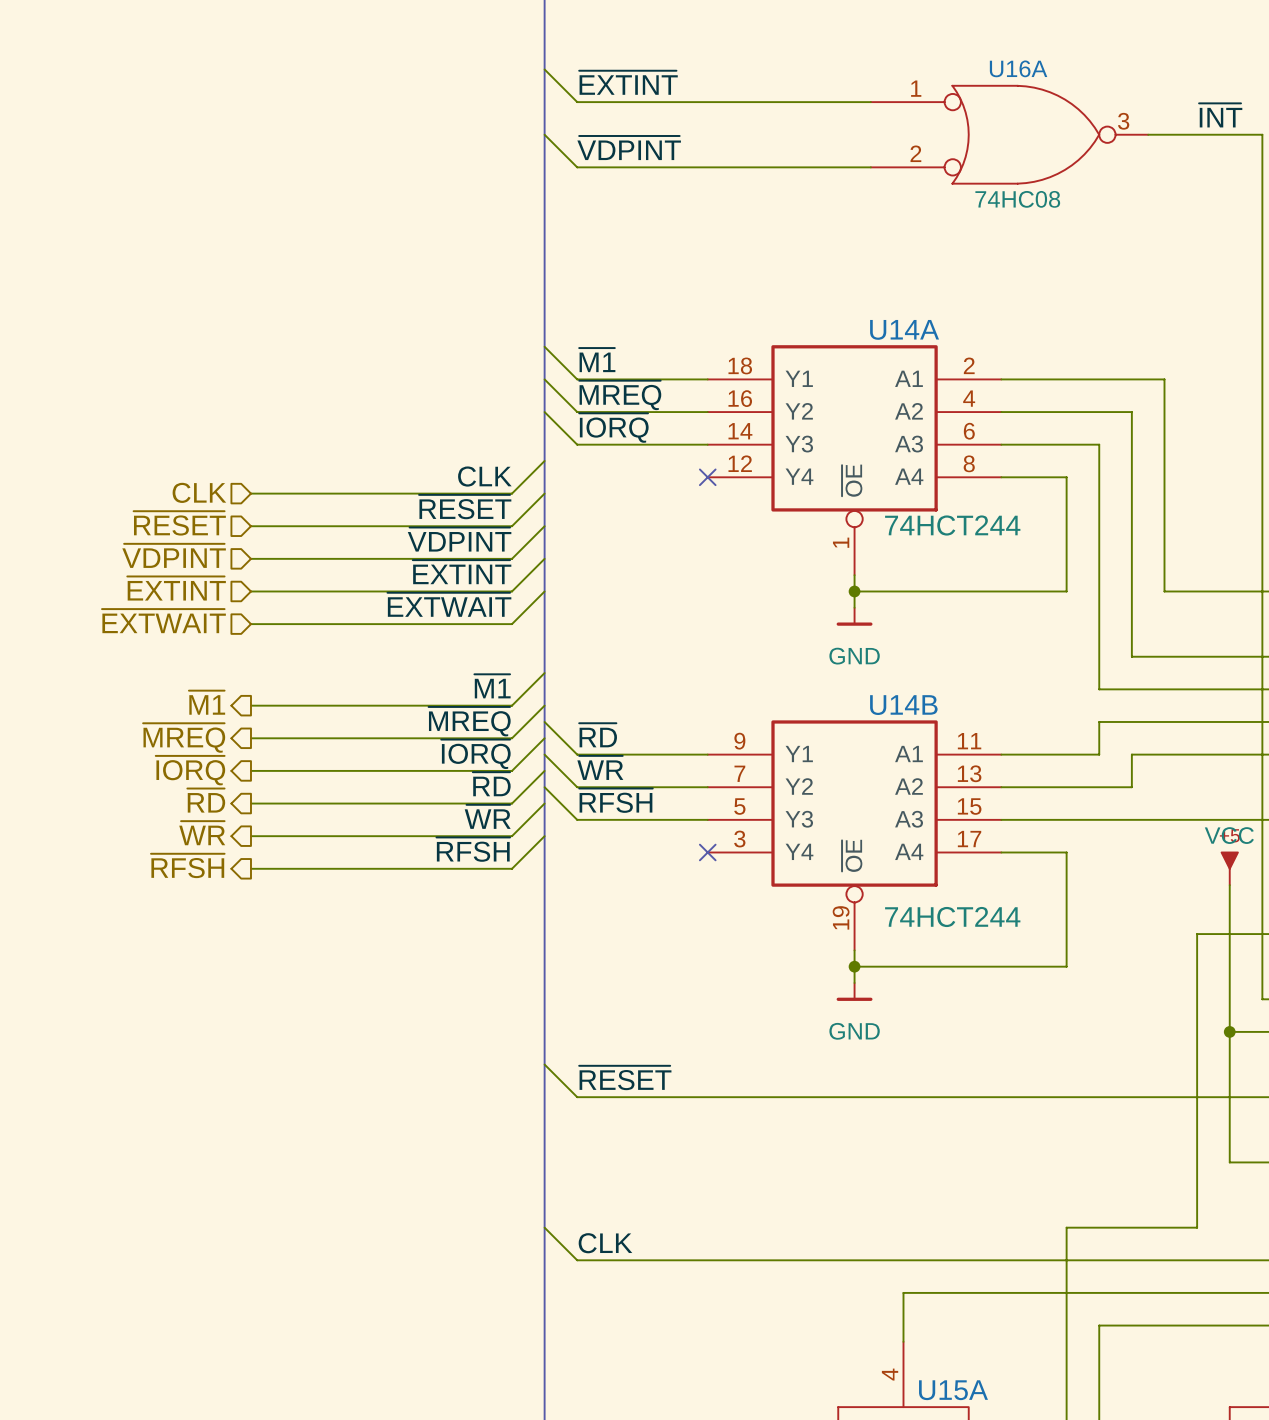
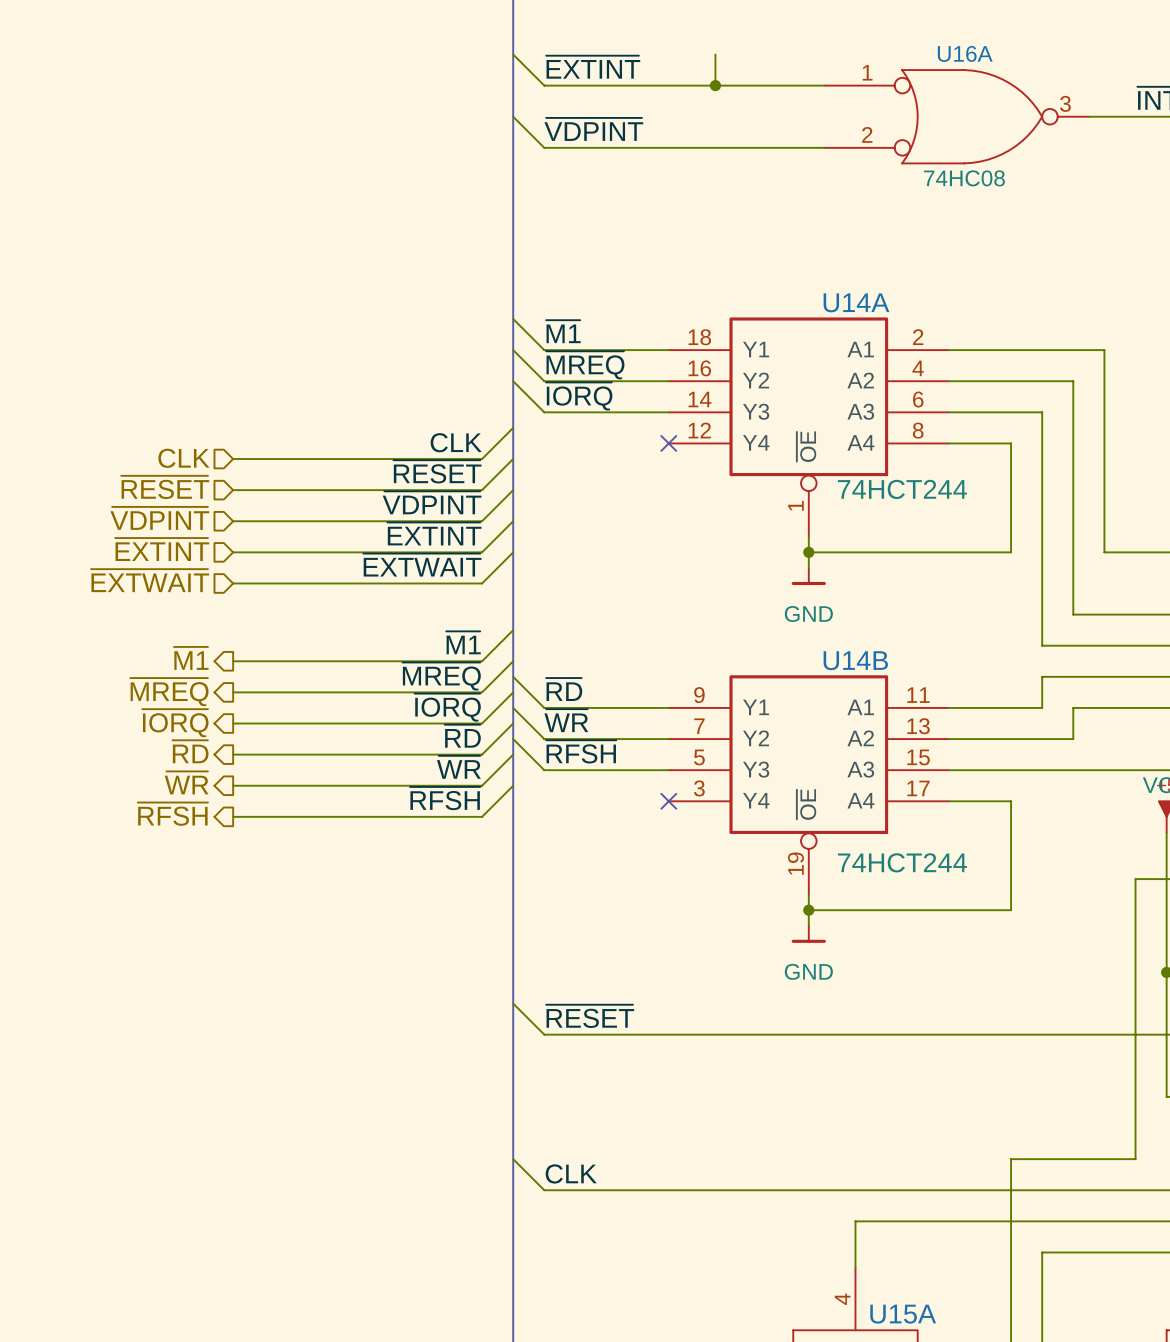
wire: none -> (715, 54) (715, 85)
junction: none -> (715, 85)

